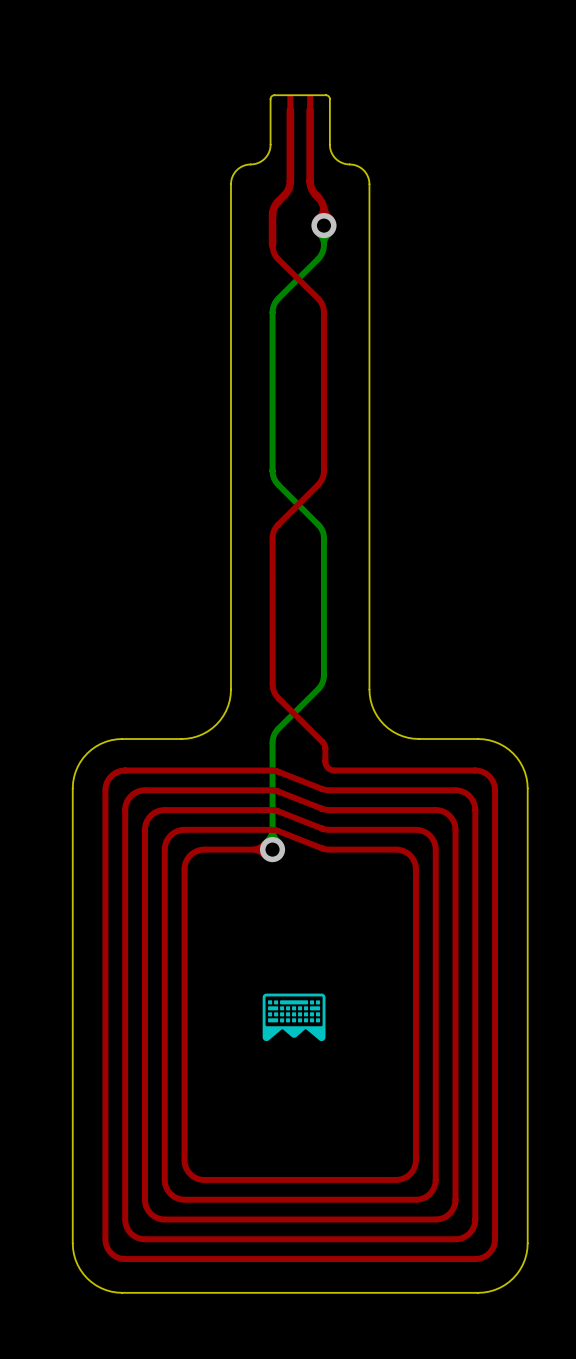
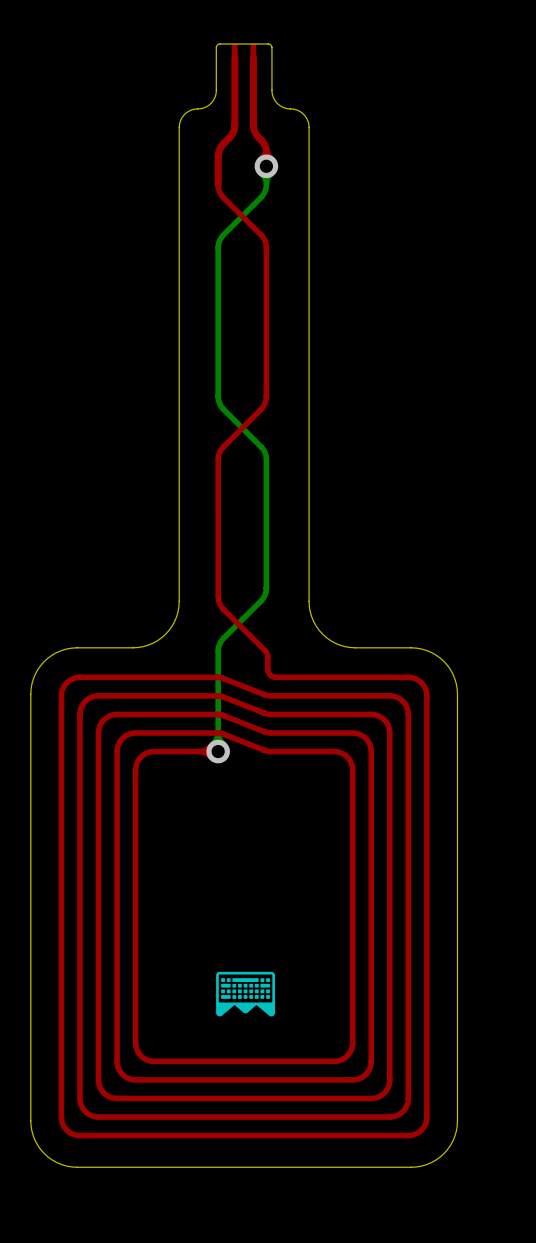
drawing position: (294, 1017) -> (245, 994)

